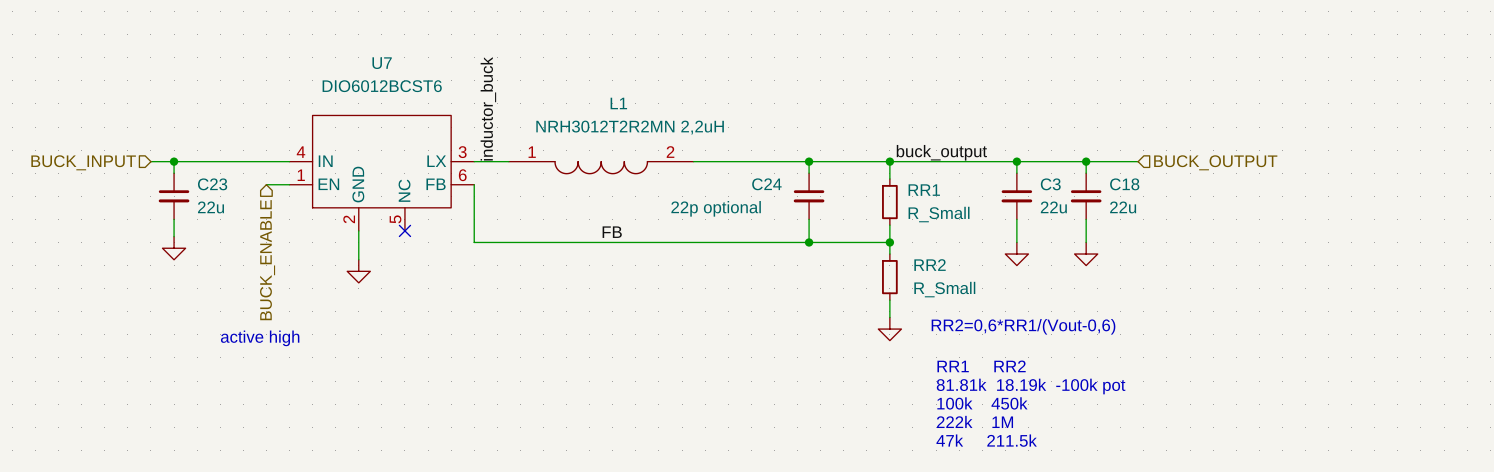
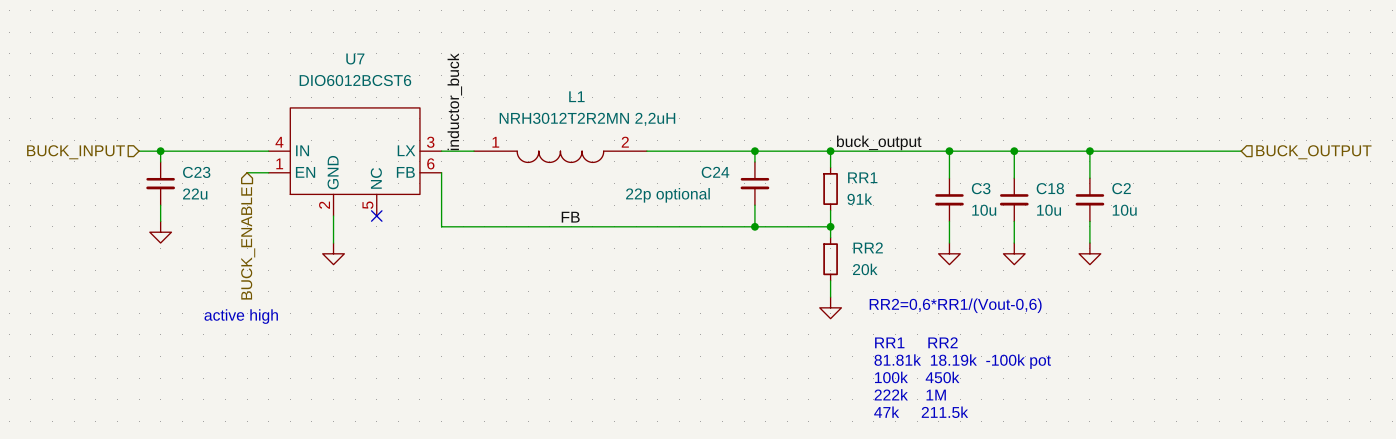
wire: none -> (1062, 151) (1241, 151)
wire: none -> (1089, 151) (1089, 178)
junction: none -> (1089, 151)
hierarchical label position: BUCK_OUTPUT (1215, 162) -> BUCK_OUTPUT (1313, 152)
C3 position: (1016, 196) -> (949, 199)
C18 position: (1086, 196) -> (1014, 199)
C3 value: 22u (1053, 207) -> 10u (984, 210)
C18 value: 22u (1123, 207) -> 10u (1049, 210)
C2: none -> 10u (1089, 199)
RR1 value: R_Small (939, 214) -> 91k (859, 199)
wire: none -> (1089, 221) (1089, 243)
power symbol position: (1016, 254) -> (949, 253)
power symbol position: (1086, 254) -> (1014, 253)
power symbol: none -> (1089, 253)
RR2 value: R_Small (944, 289) -> 20k (865, 269)

